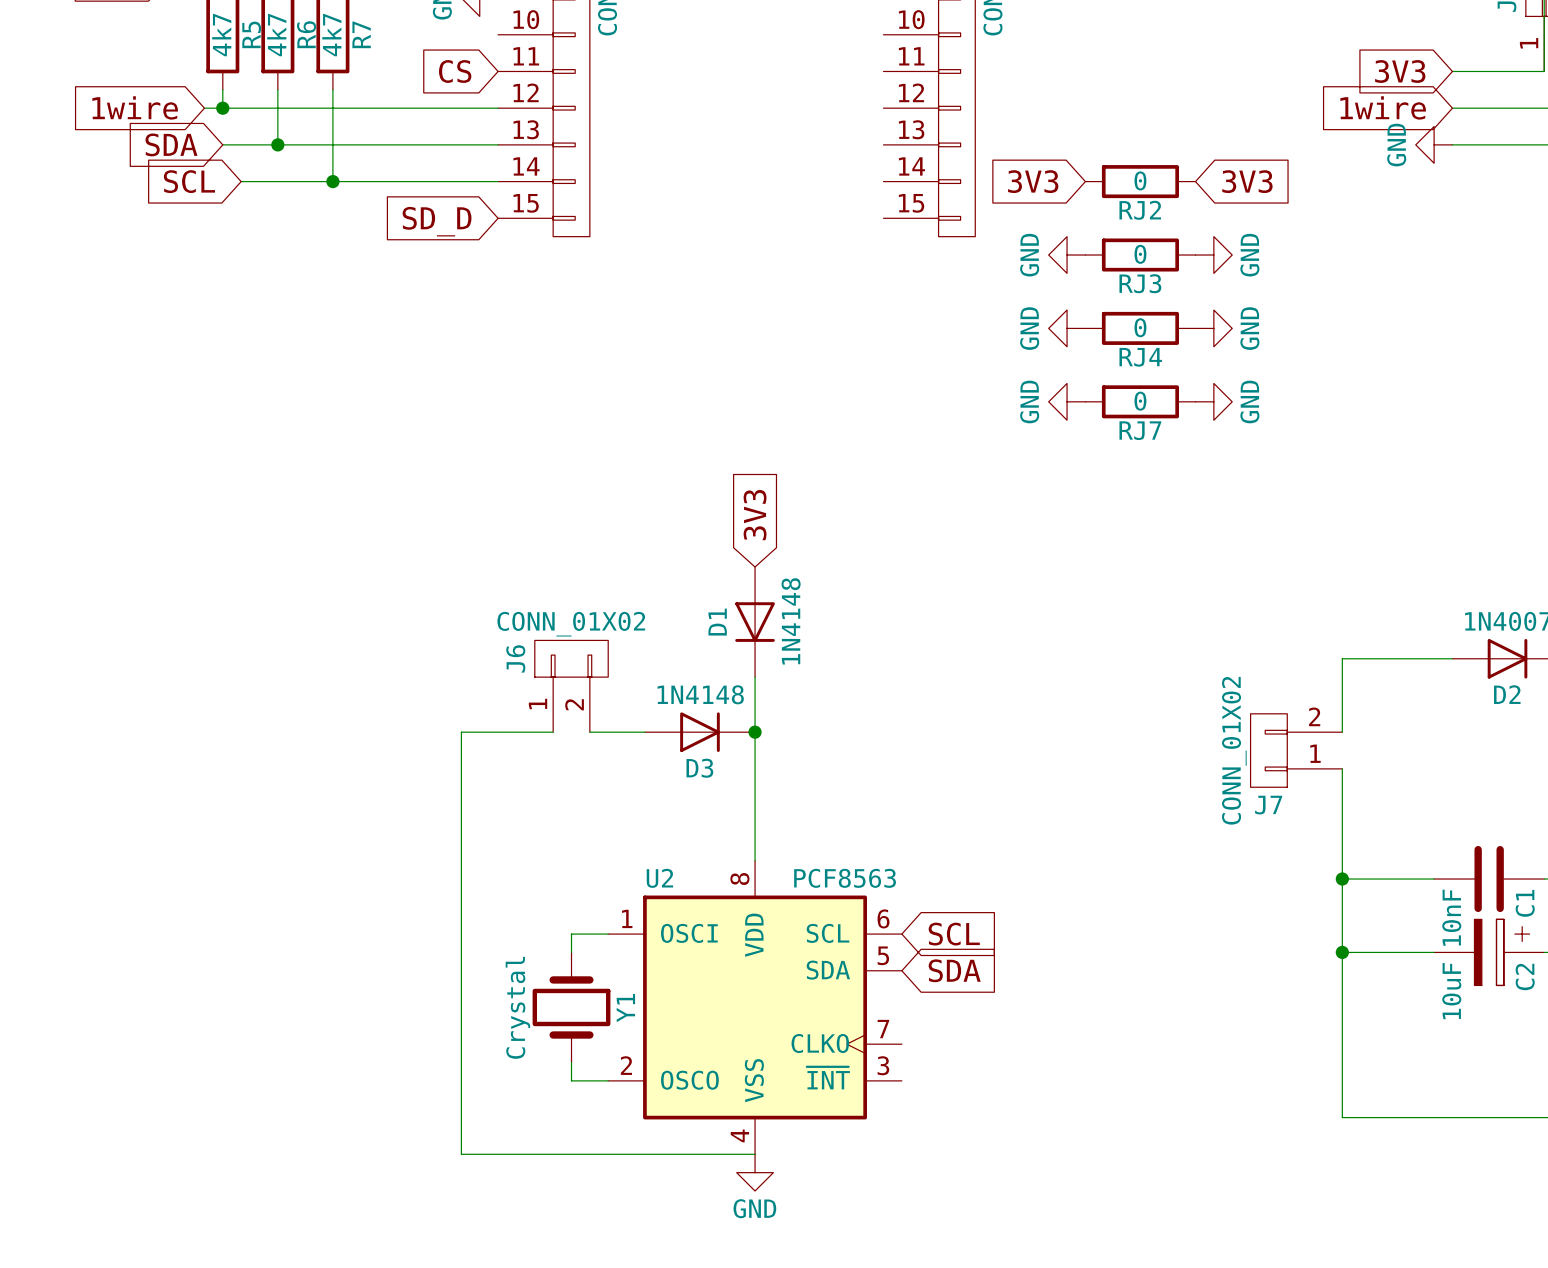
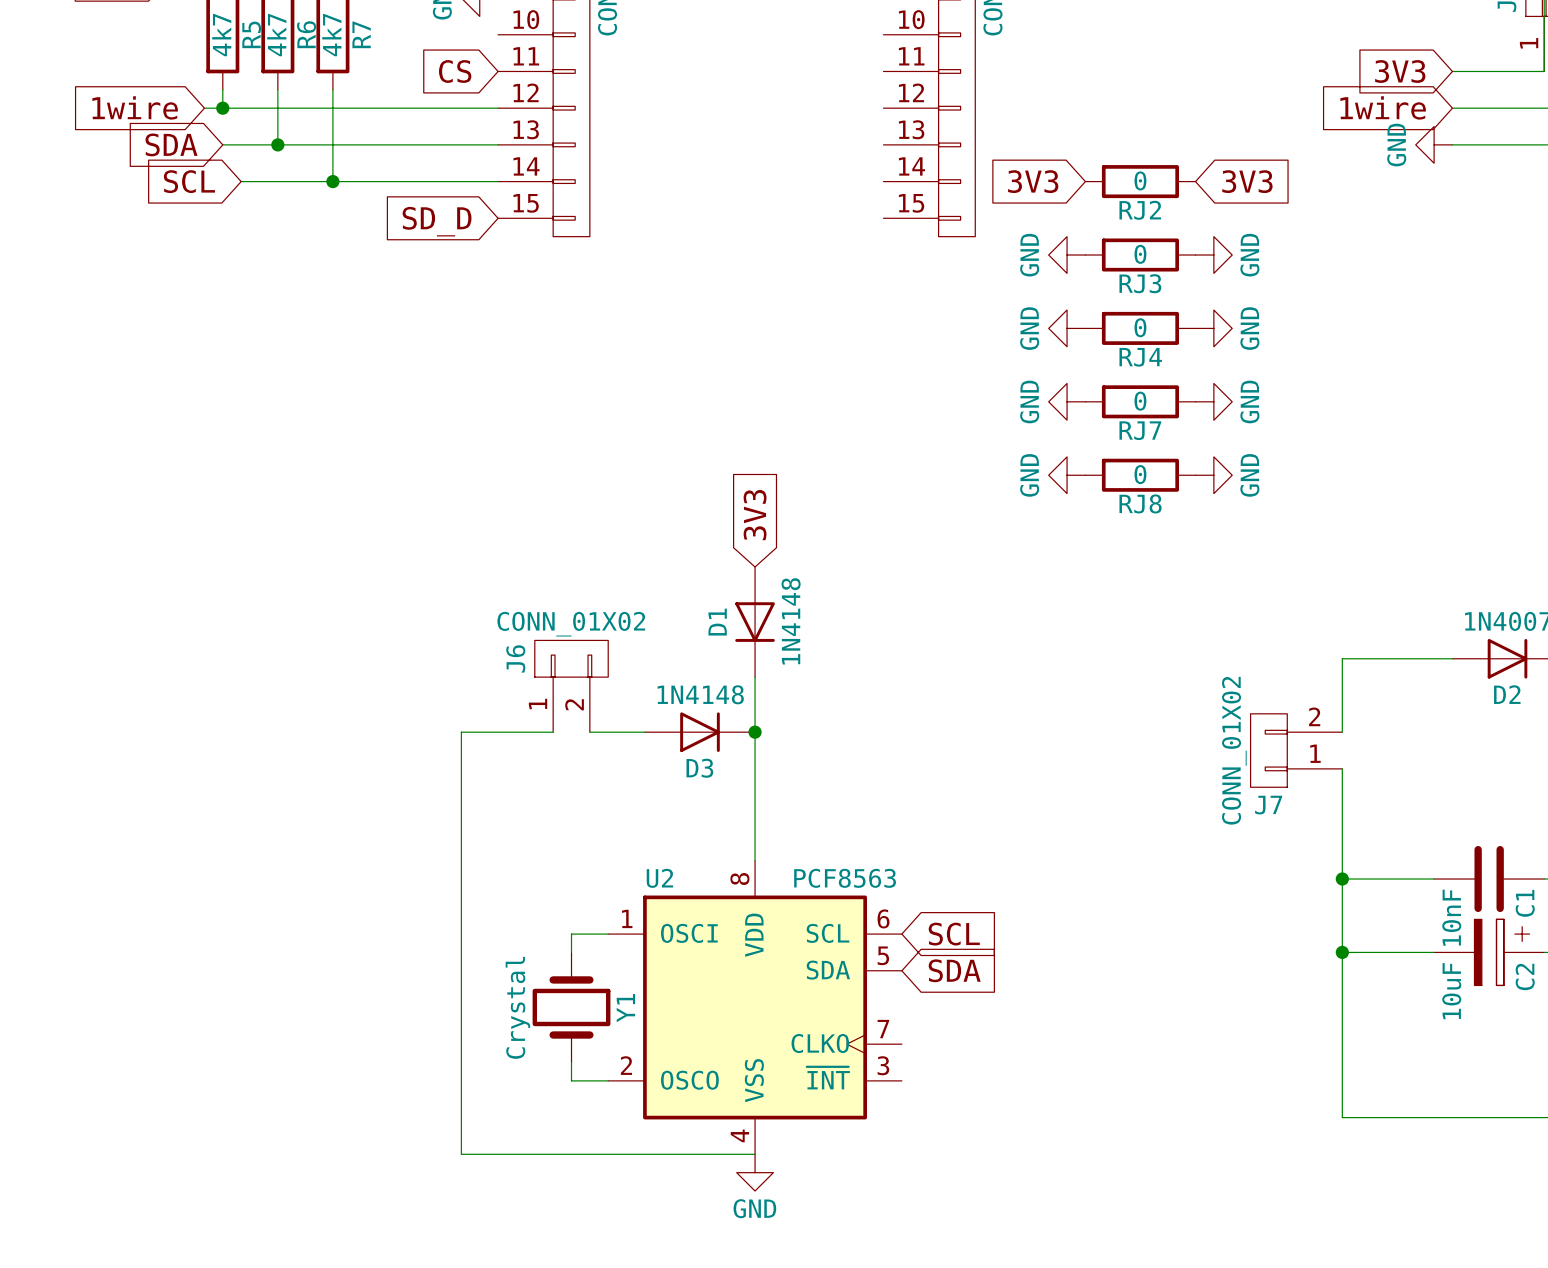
power symbol: none -> GND (1067, 475)
RJ8: none -> 0 (1140, 475)
power symbol: none -> GND (1213, 475)

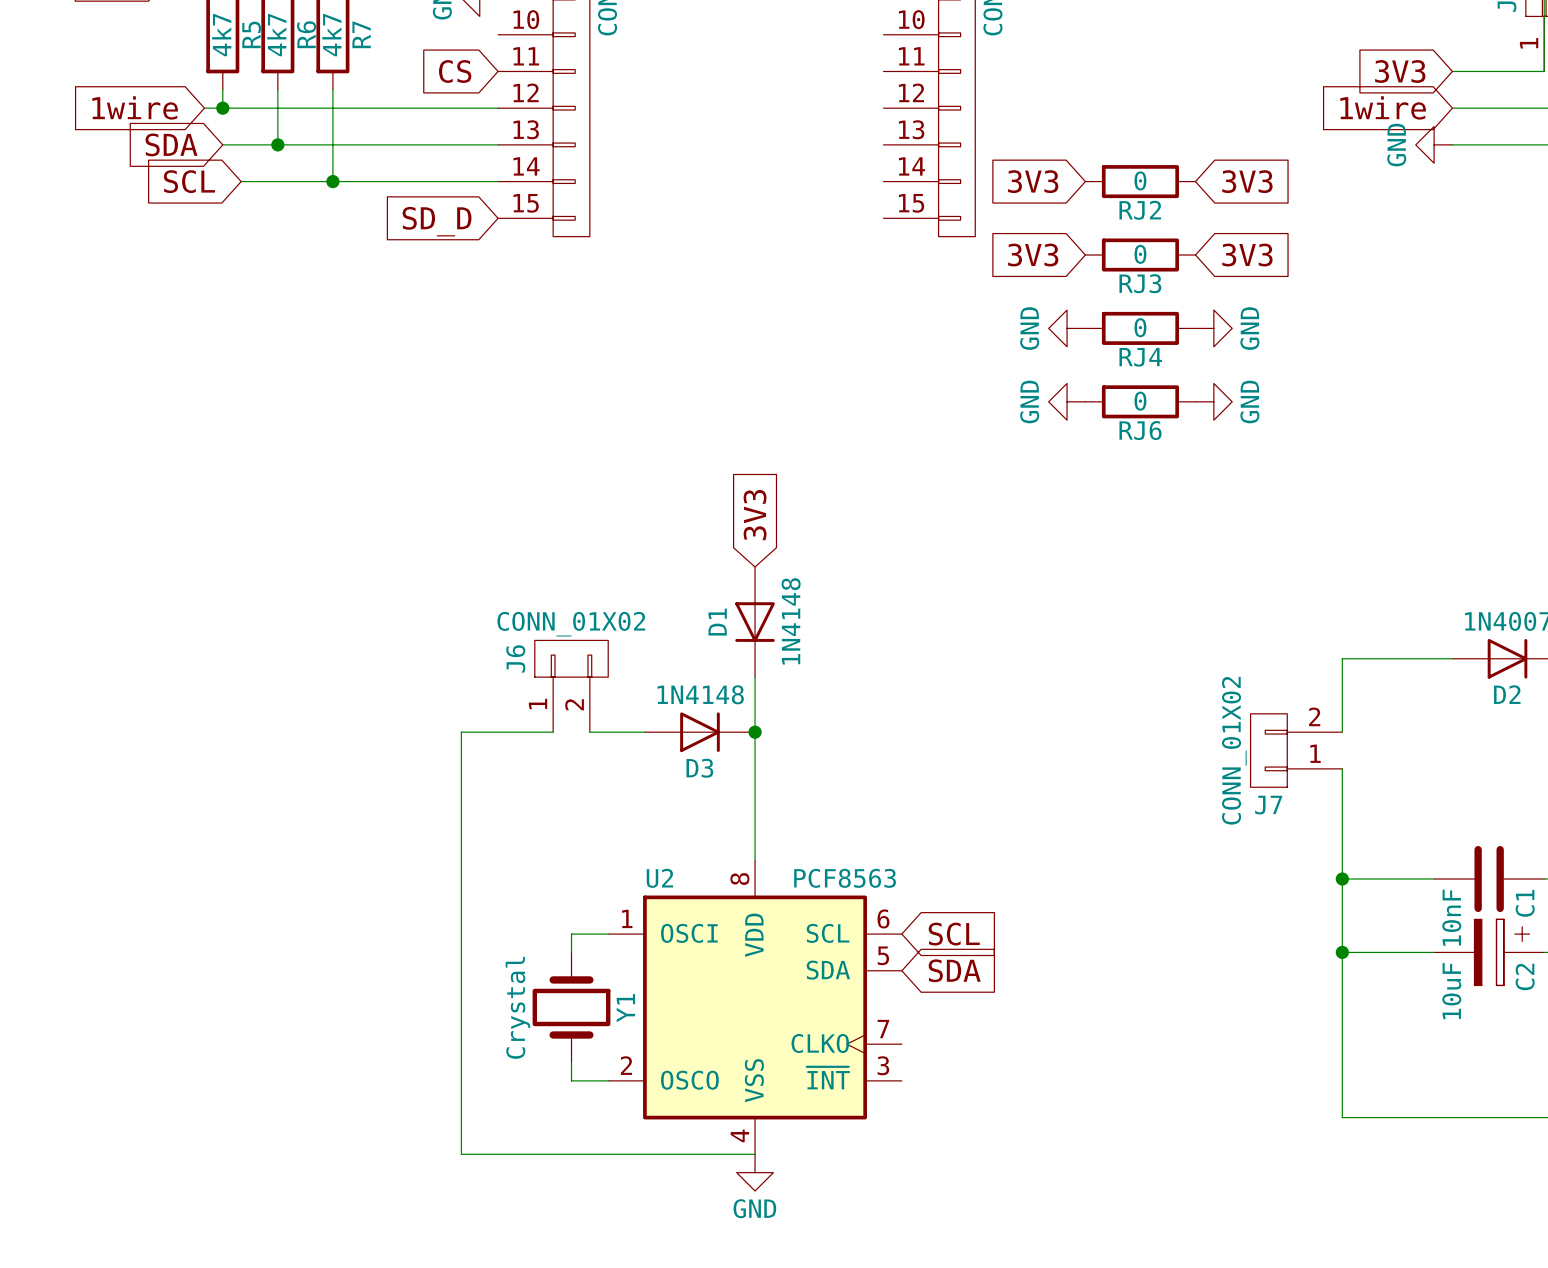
global label: none -> 3V3 (1033, 255)
power symbol: GND (1067, 255) -> none
power symbol: GND (1213, 255) -> none
global label: none -> 3V3 (1247, 255)
RJ7 name: RJ7 (1140, 430) -> RJ6 (1140, 430)
power symbol: GND (1067, 475) -> none
RJ8: 0 (1140, 475) -> none
power symbol: GND (1213, 475) -> none

